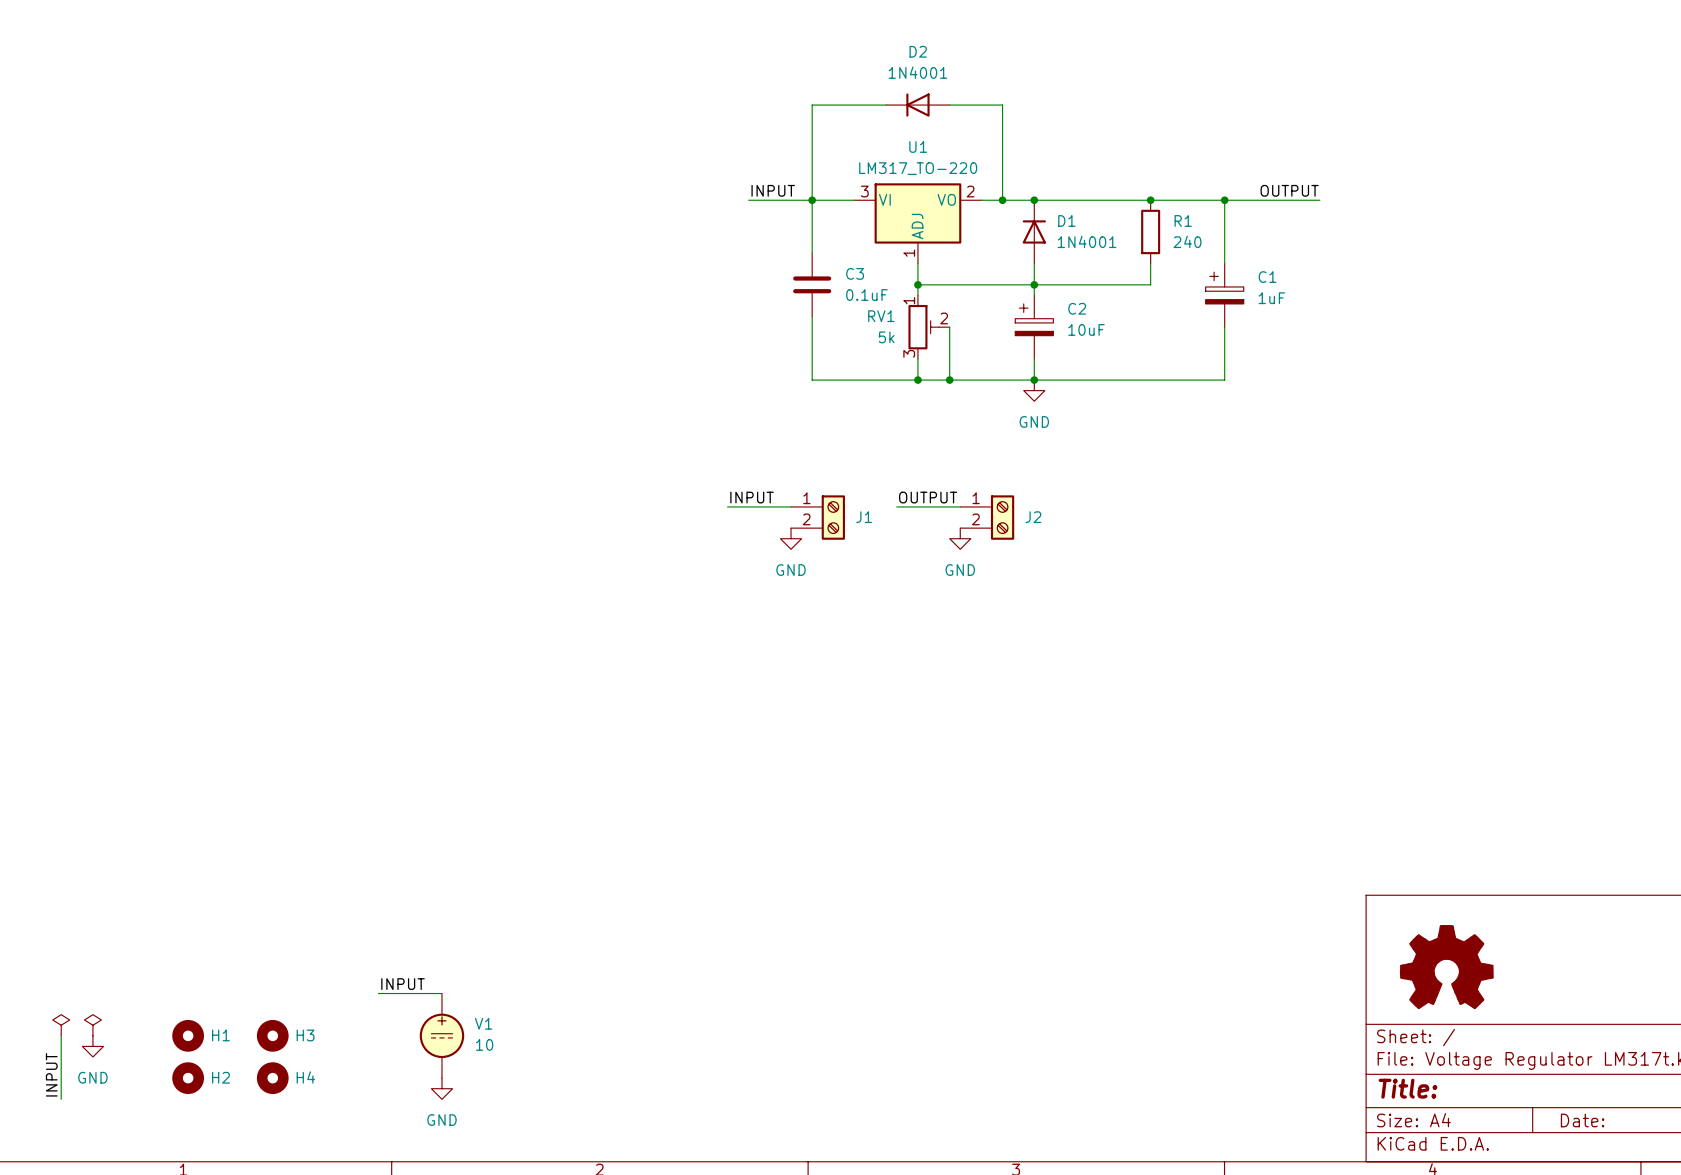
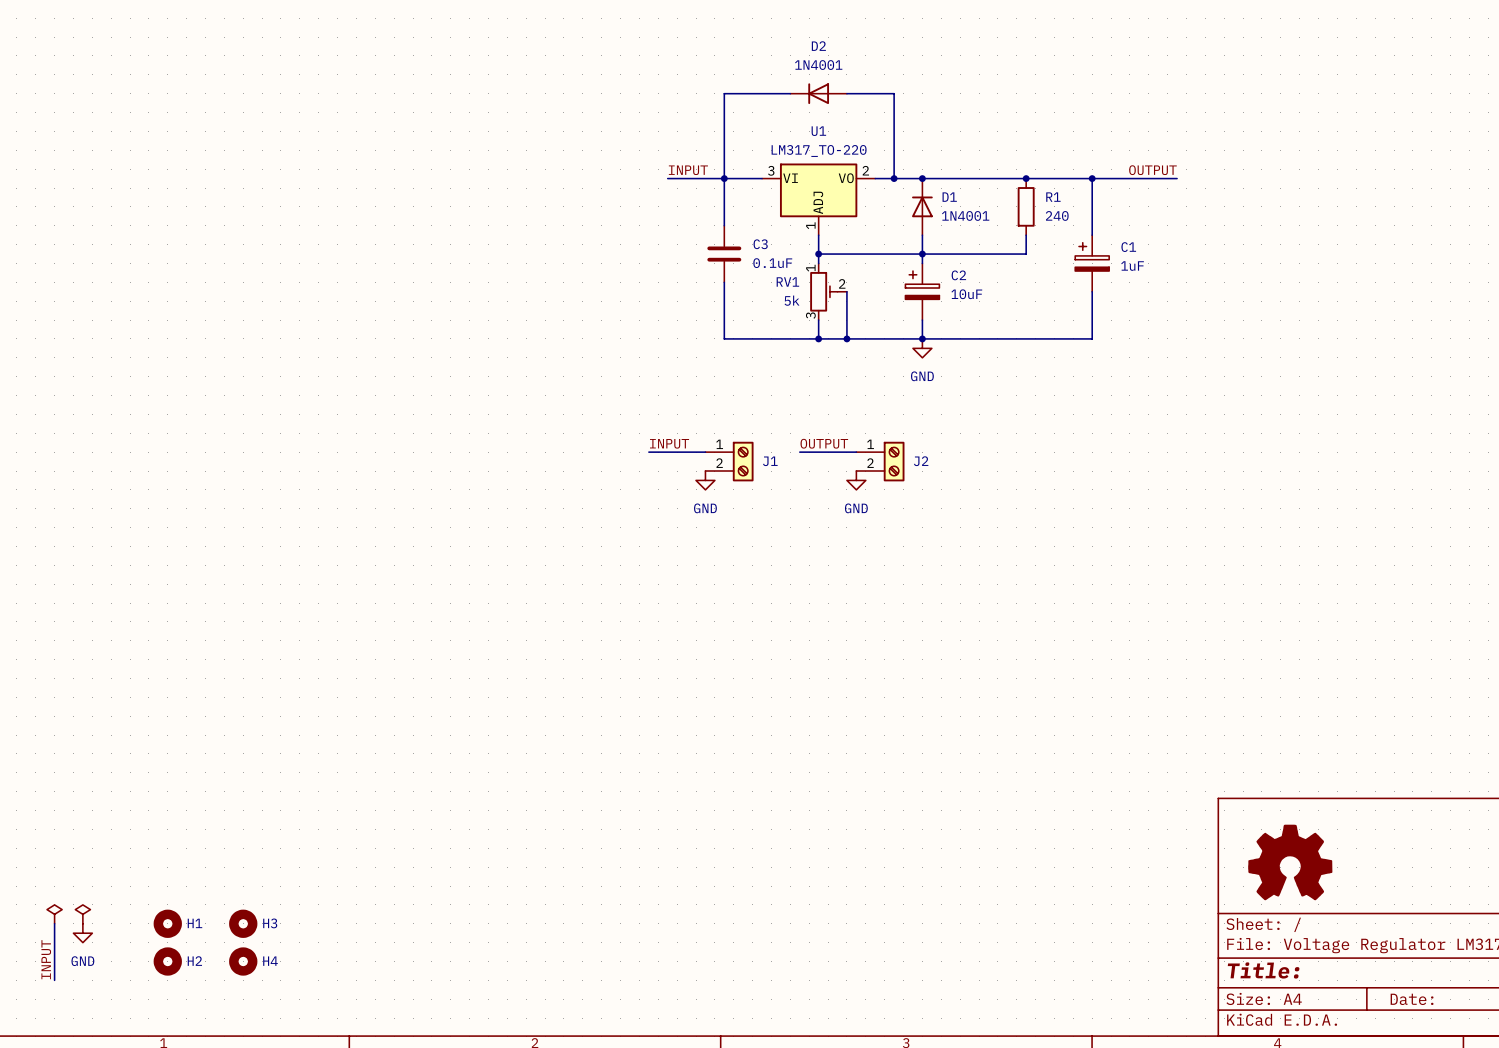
label: INPUT (403, 984) -> none
wire: (378, 993) (441, 993) -> none
V1: 10 (441, 1035) -> none
power symbol: GND (441, 1088) -> none

